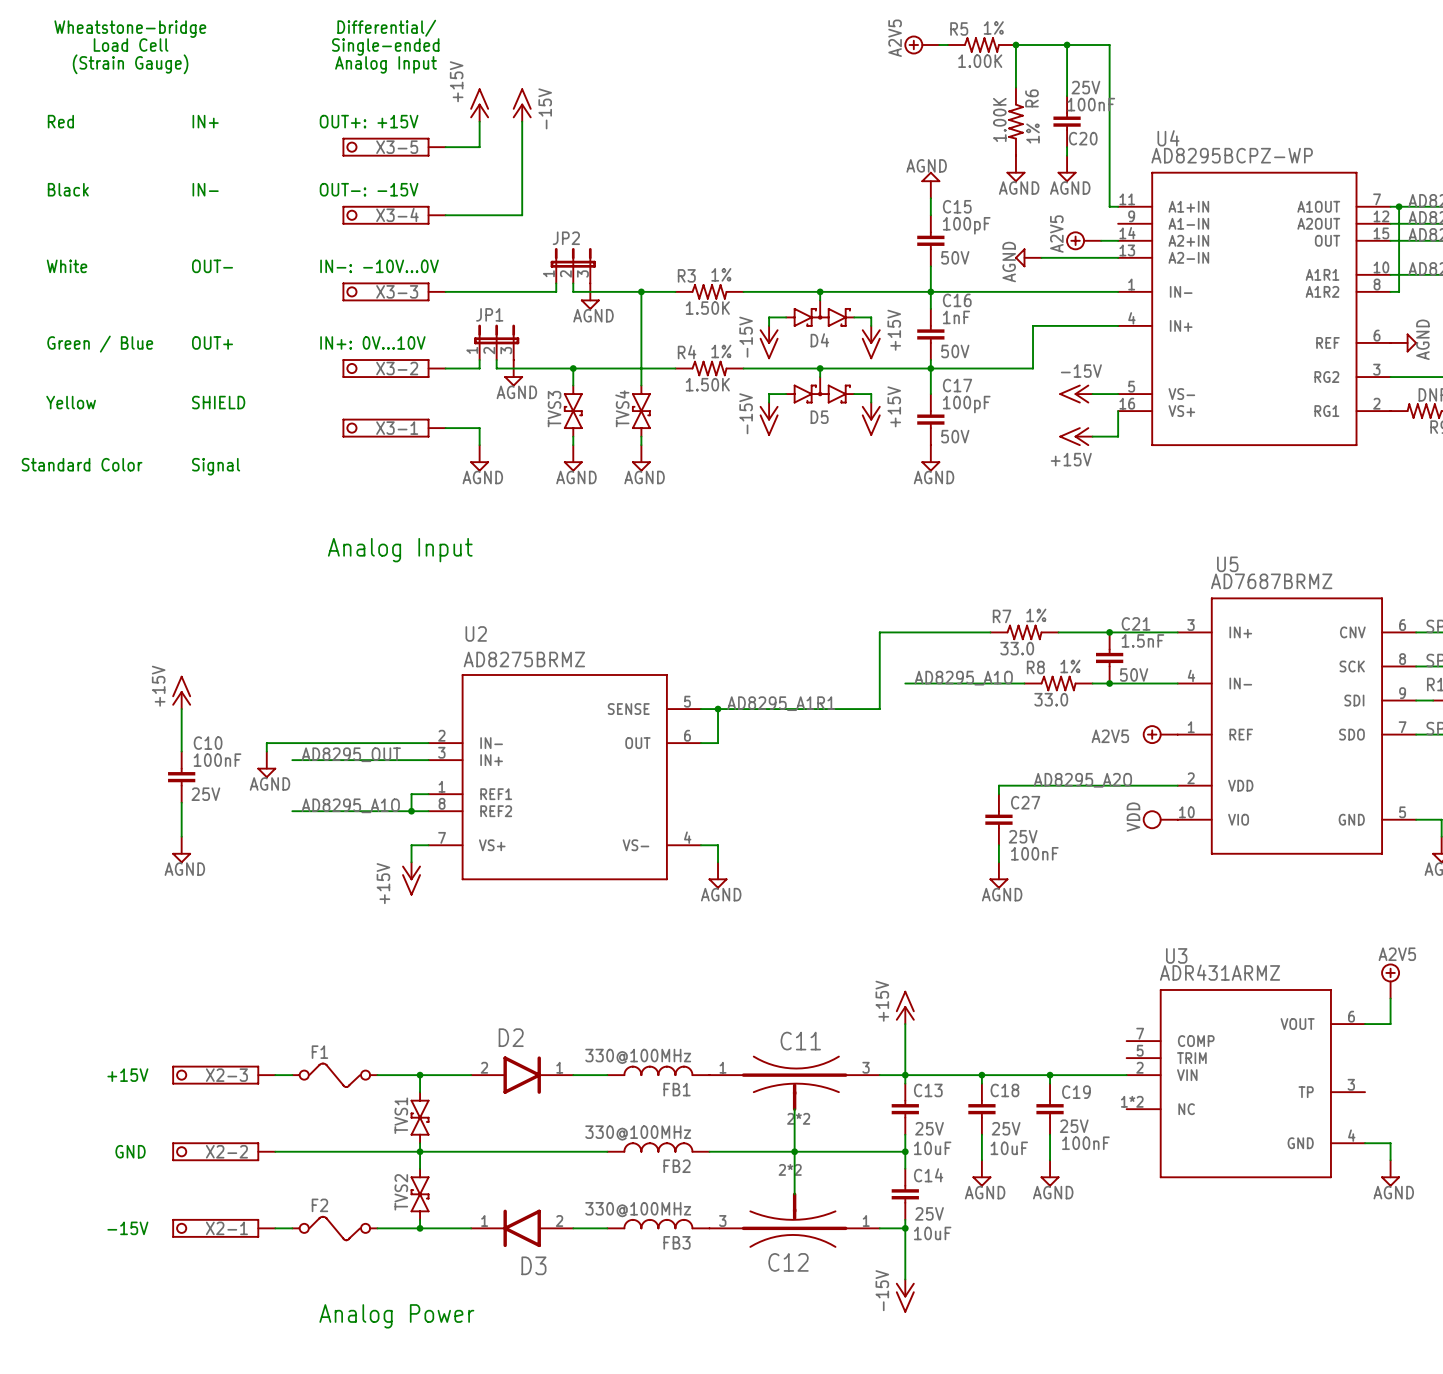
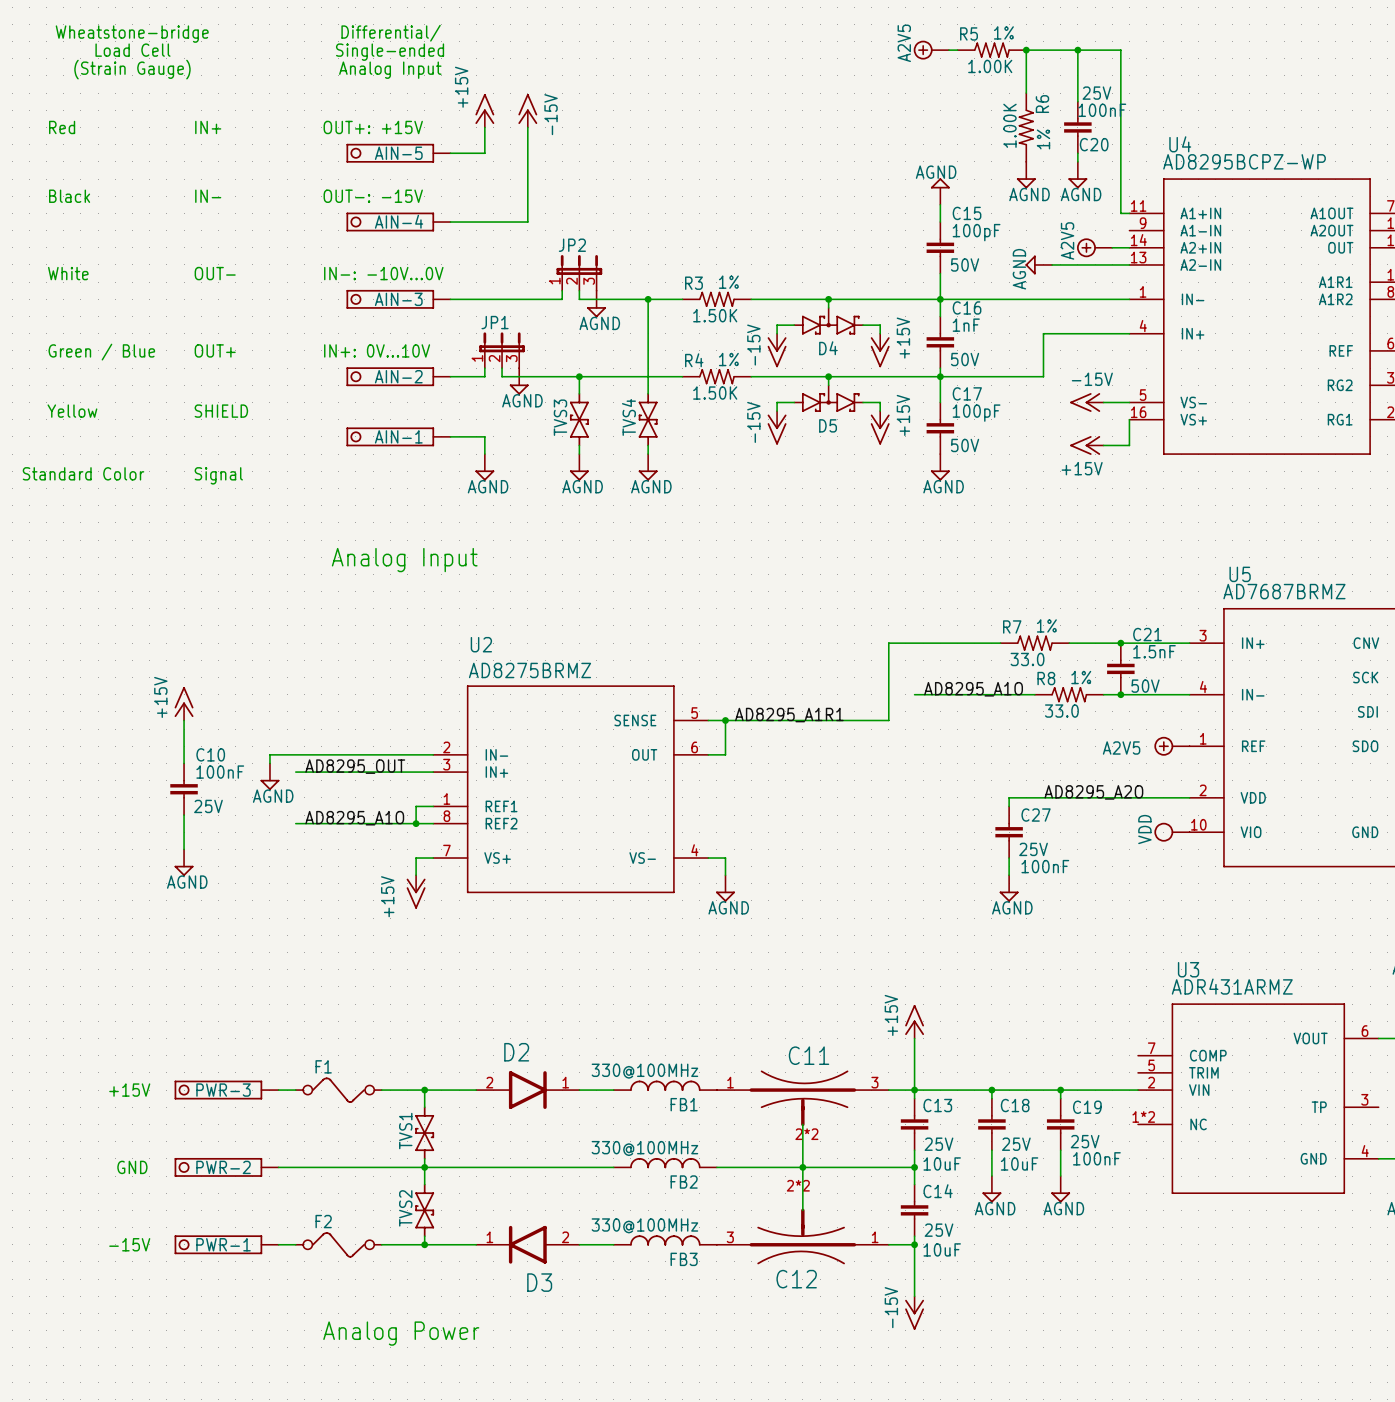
X3-5 name: X3-5 (397, 147) -> AIN-5 (398, 153)
X3-4 name: X3-4 (397, 214) -> AIN-4 (399, 221)
X3-3 name: X3-3 (397, 291) -> AIN-3 (398, 299)
X3-2 name: X3-2 (397, 368) -> AIN-2 (398, 376)
X3-1 name: X3-1 (397, 428) -> AIN-1 (398, 436)
X2-3 name: X2-3 (226, 1075) -> PWR-3 (223, 1090)
X2-2 name: X2-2 (226, 1151) -> PWR-2 (223, 1167)
X2-1 name: X2-1 (226, 1228) -> PWR-1 (223, 1244)

